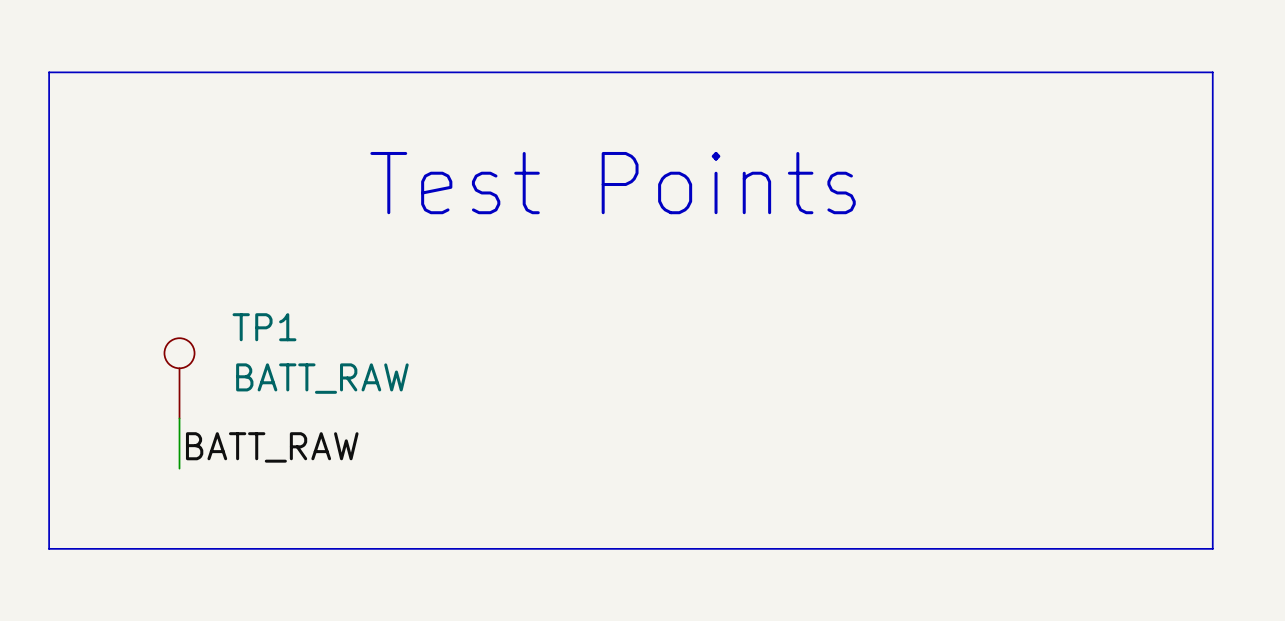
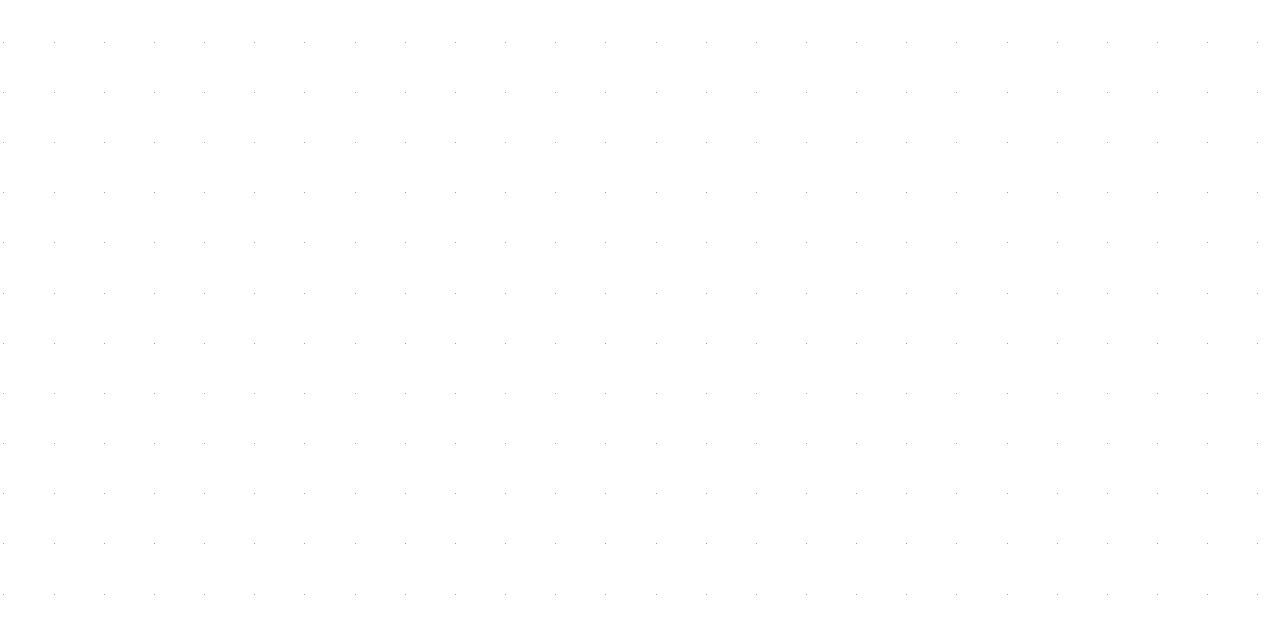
line: (49, 72) (1212, 72) (1212, 548) (49, 548) (49, 72) -> none
text: Test Points (613, 183) -> none
TP1: BATT_RAW (179, 378) -> none
wire: (179, 418) (179, 468) -> none
label: BATT_RAW (272, 447) -> none

